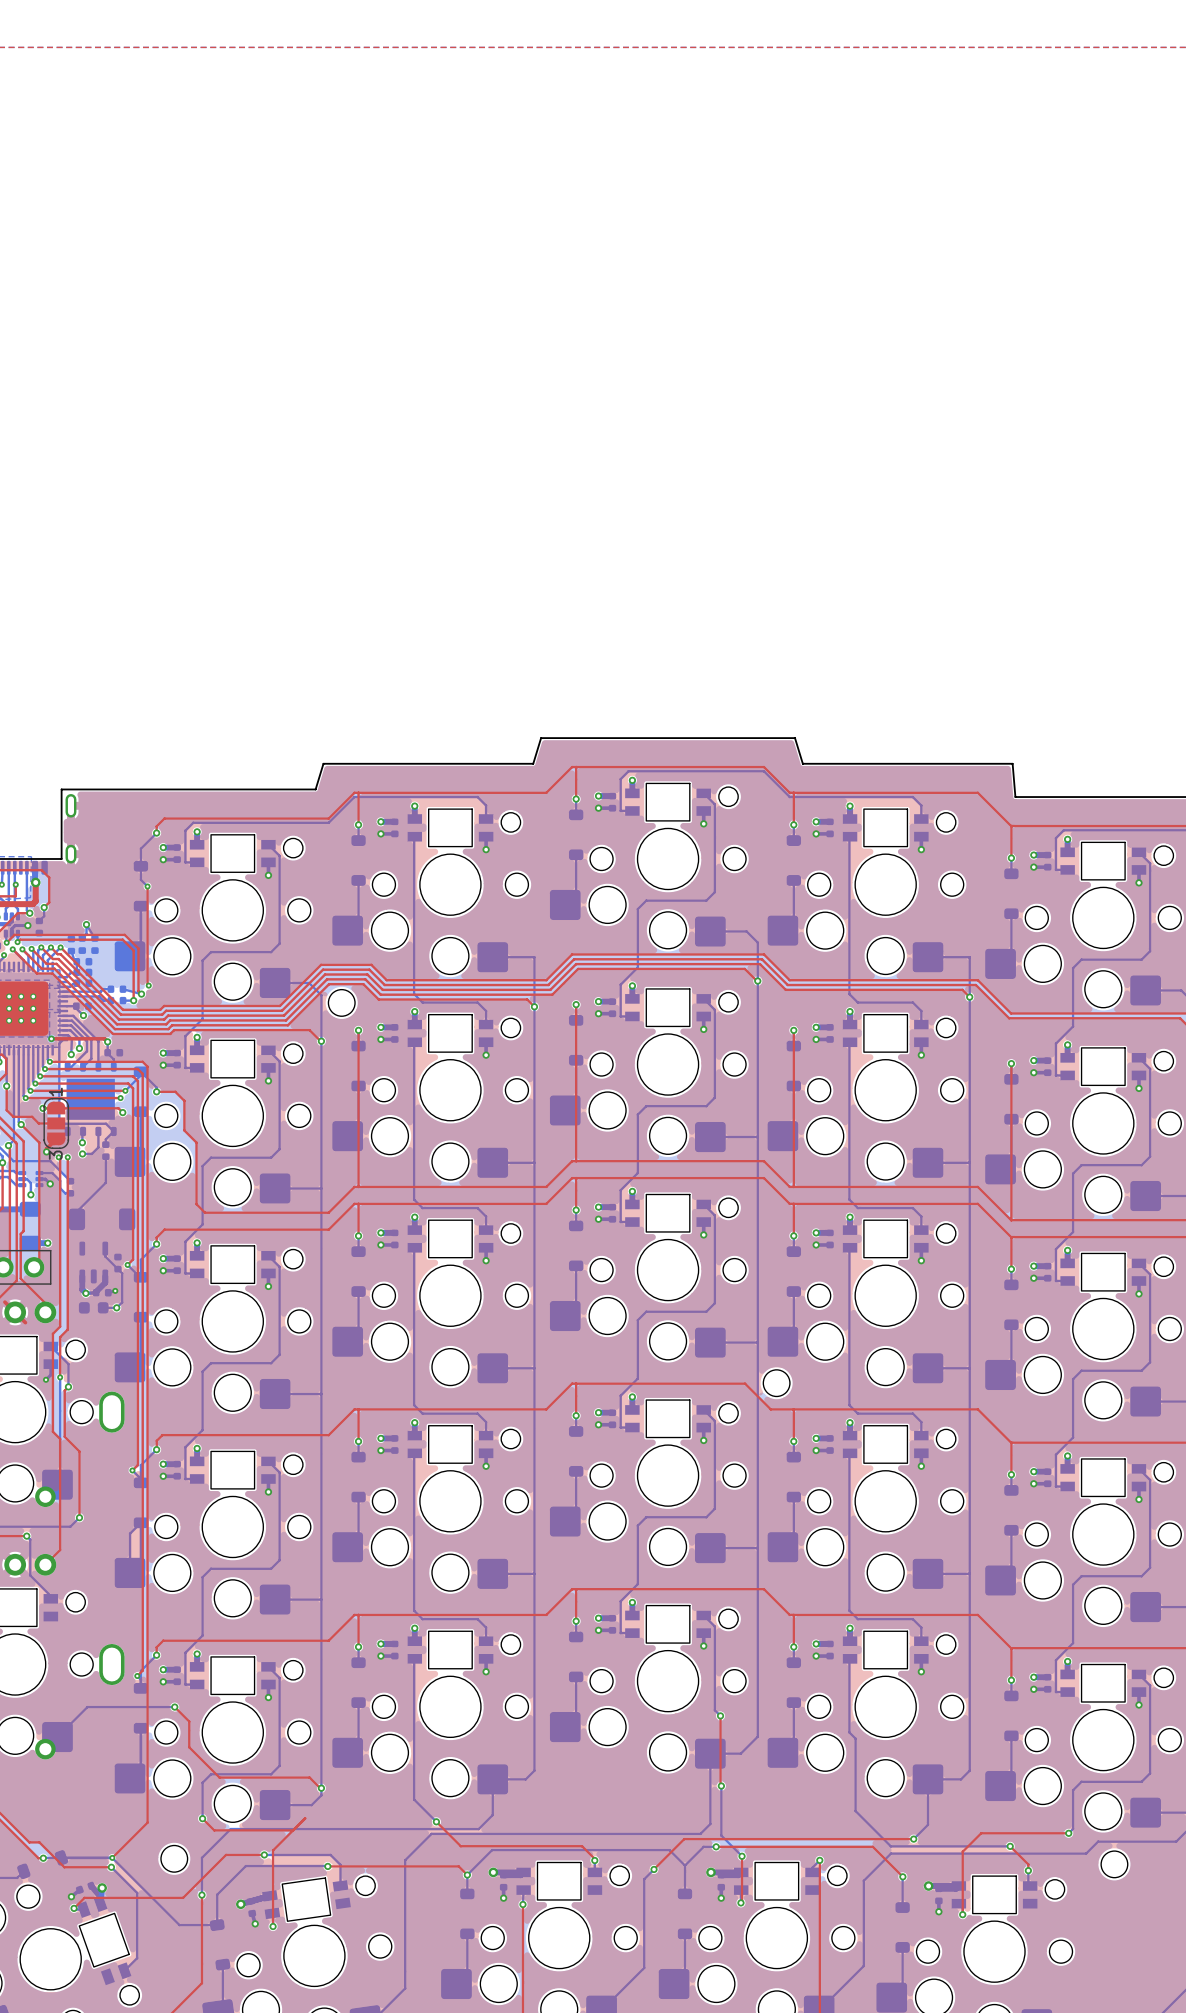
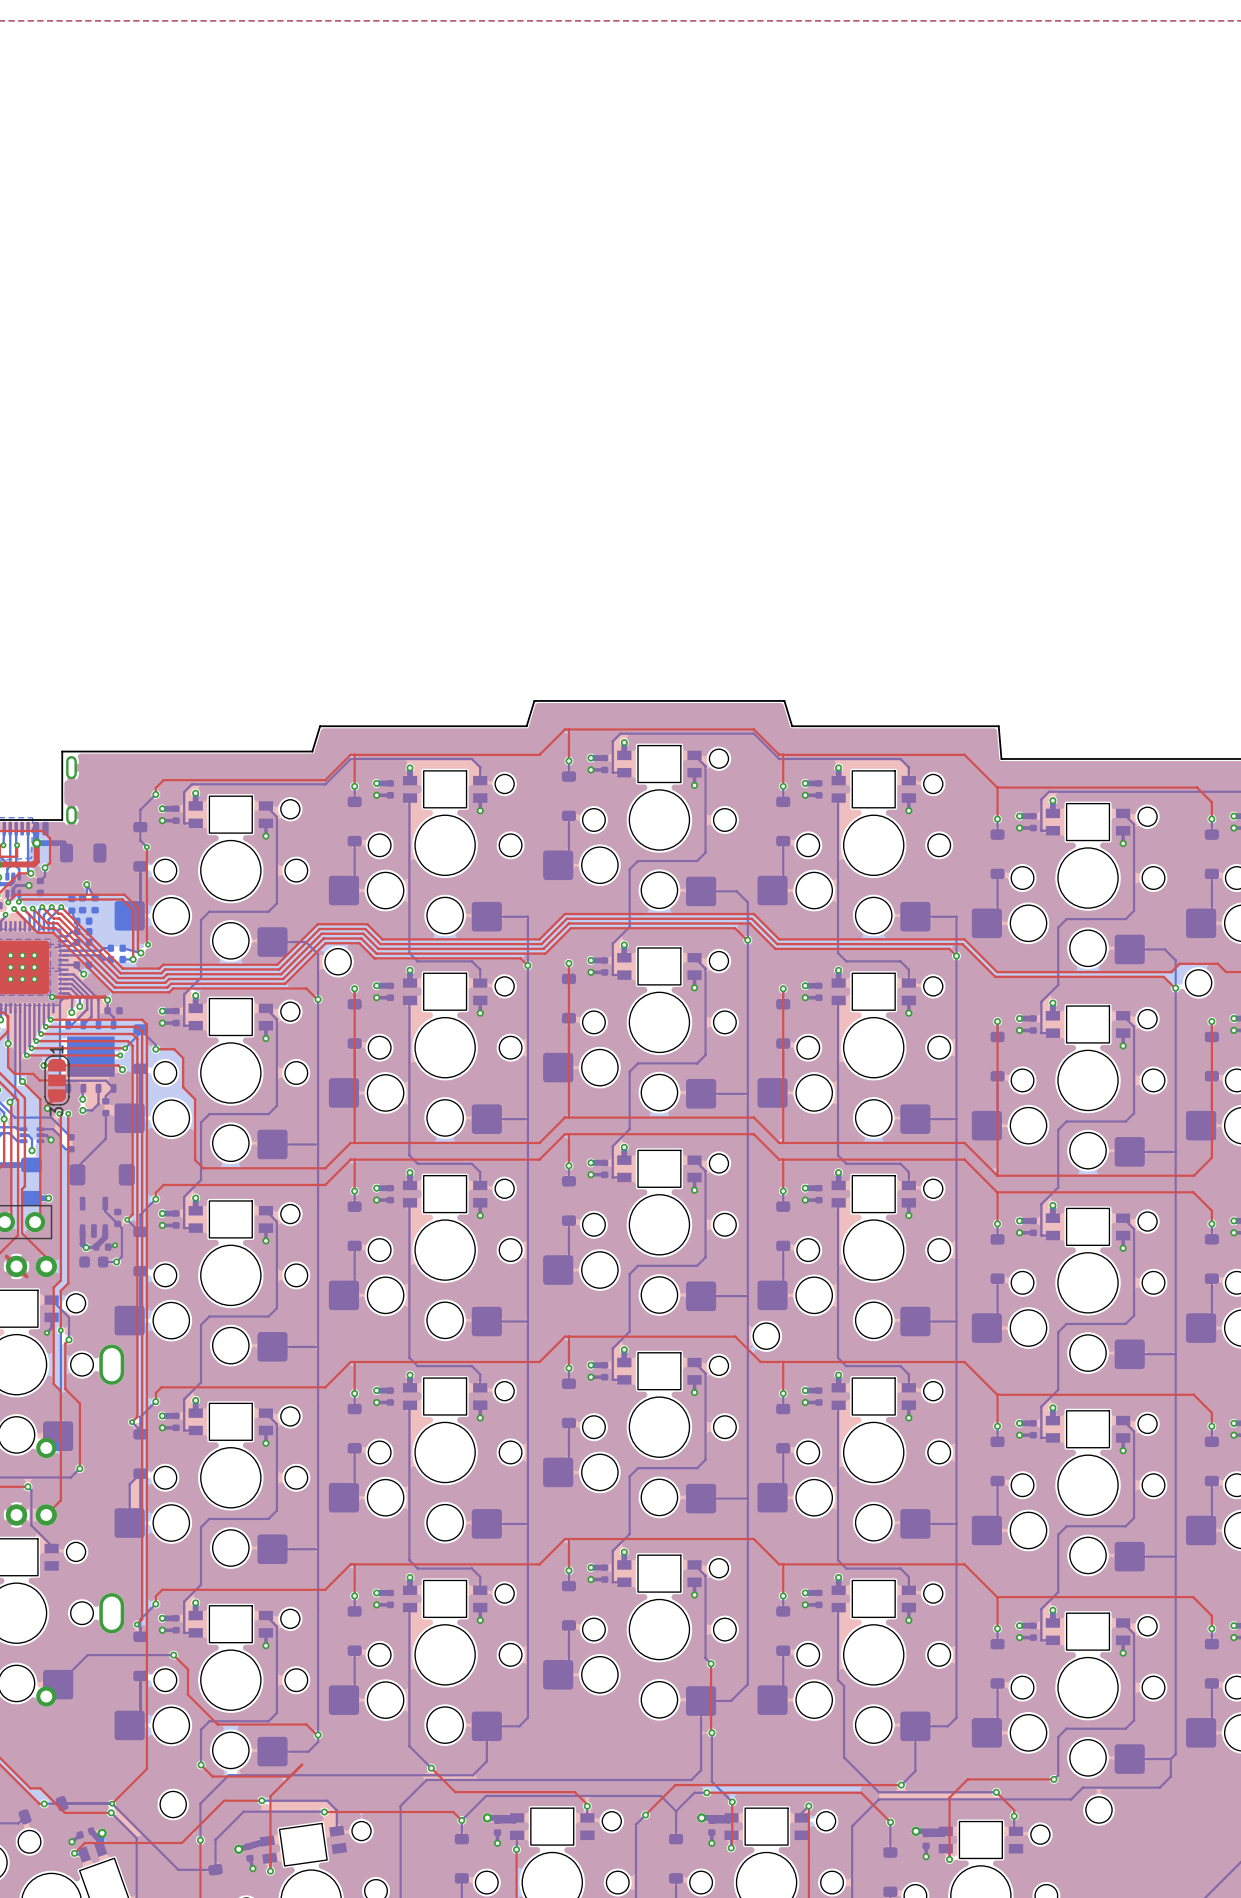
bottom track: none -> (36, 843) (64, 843)
part: none -> (83, 853)

